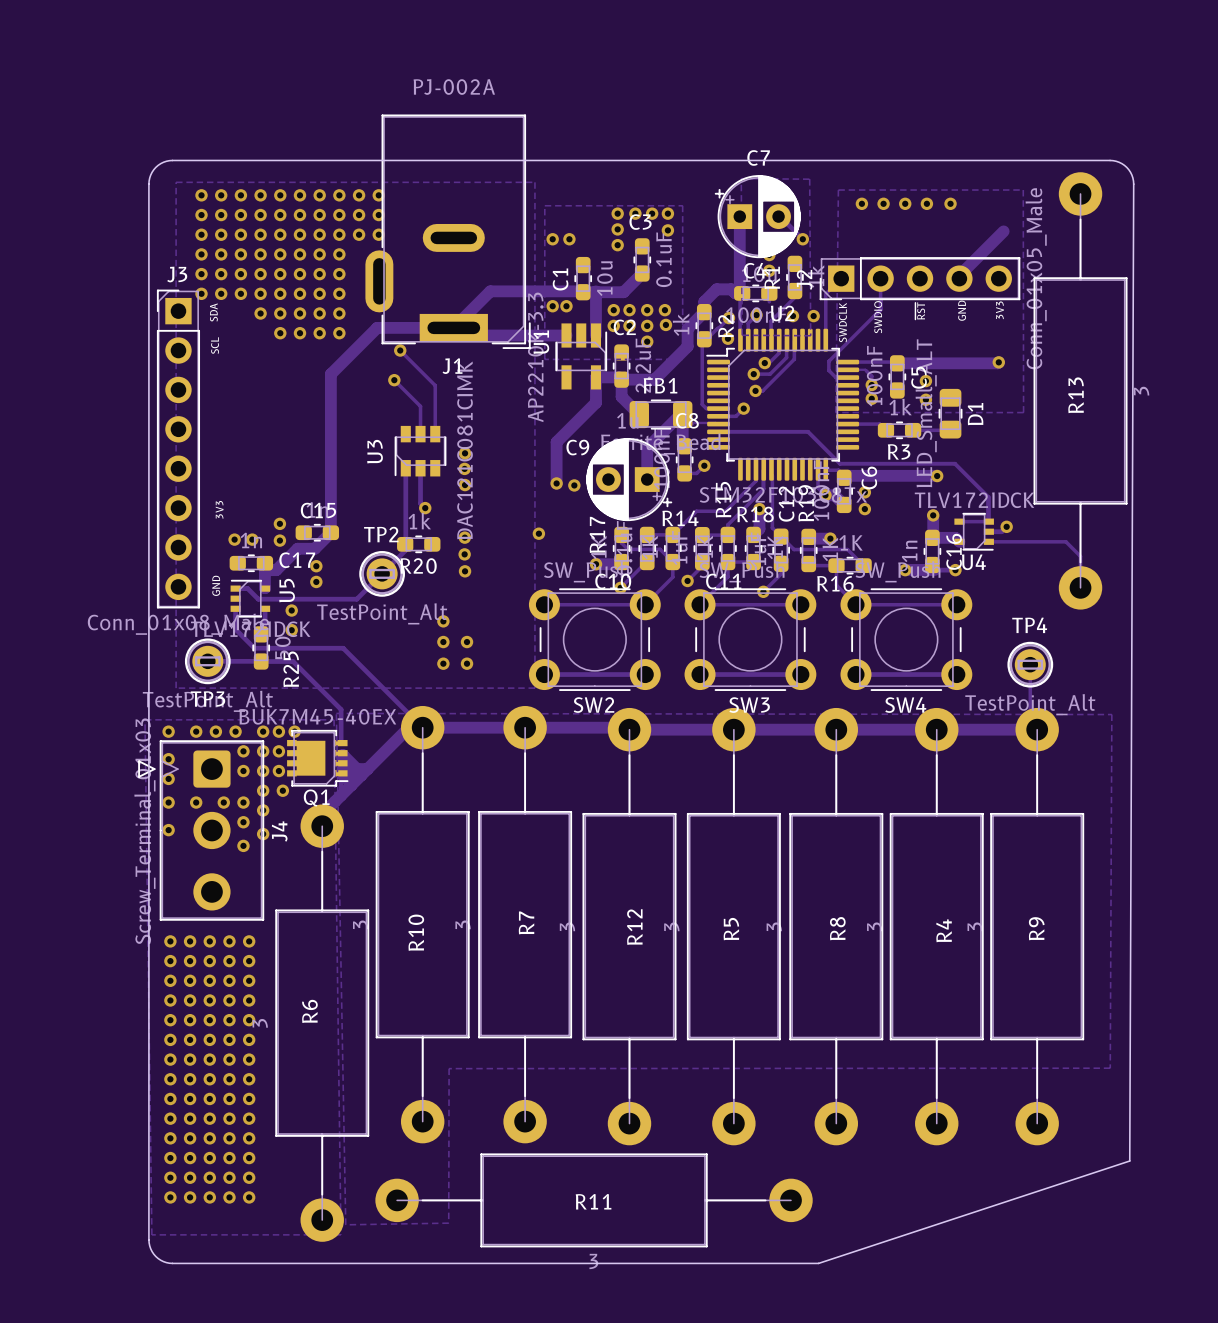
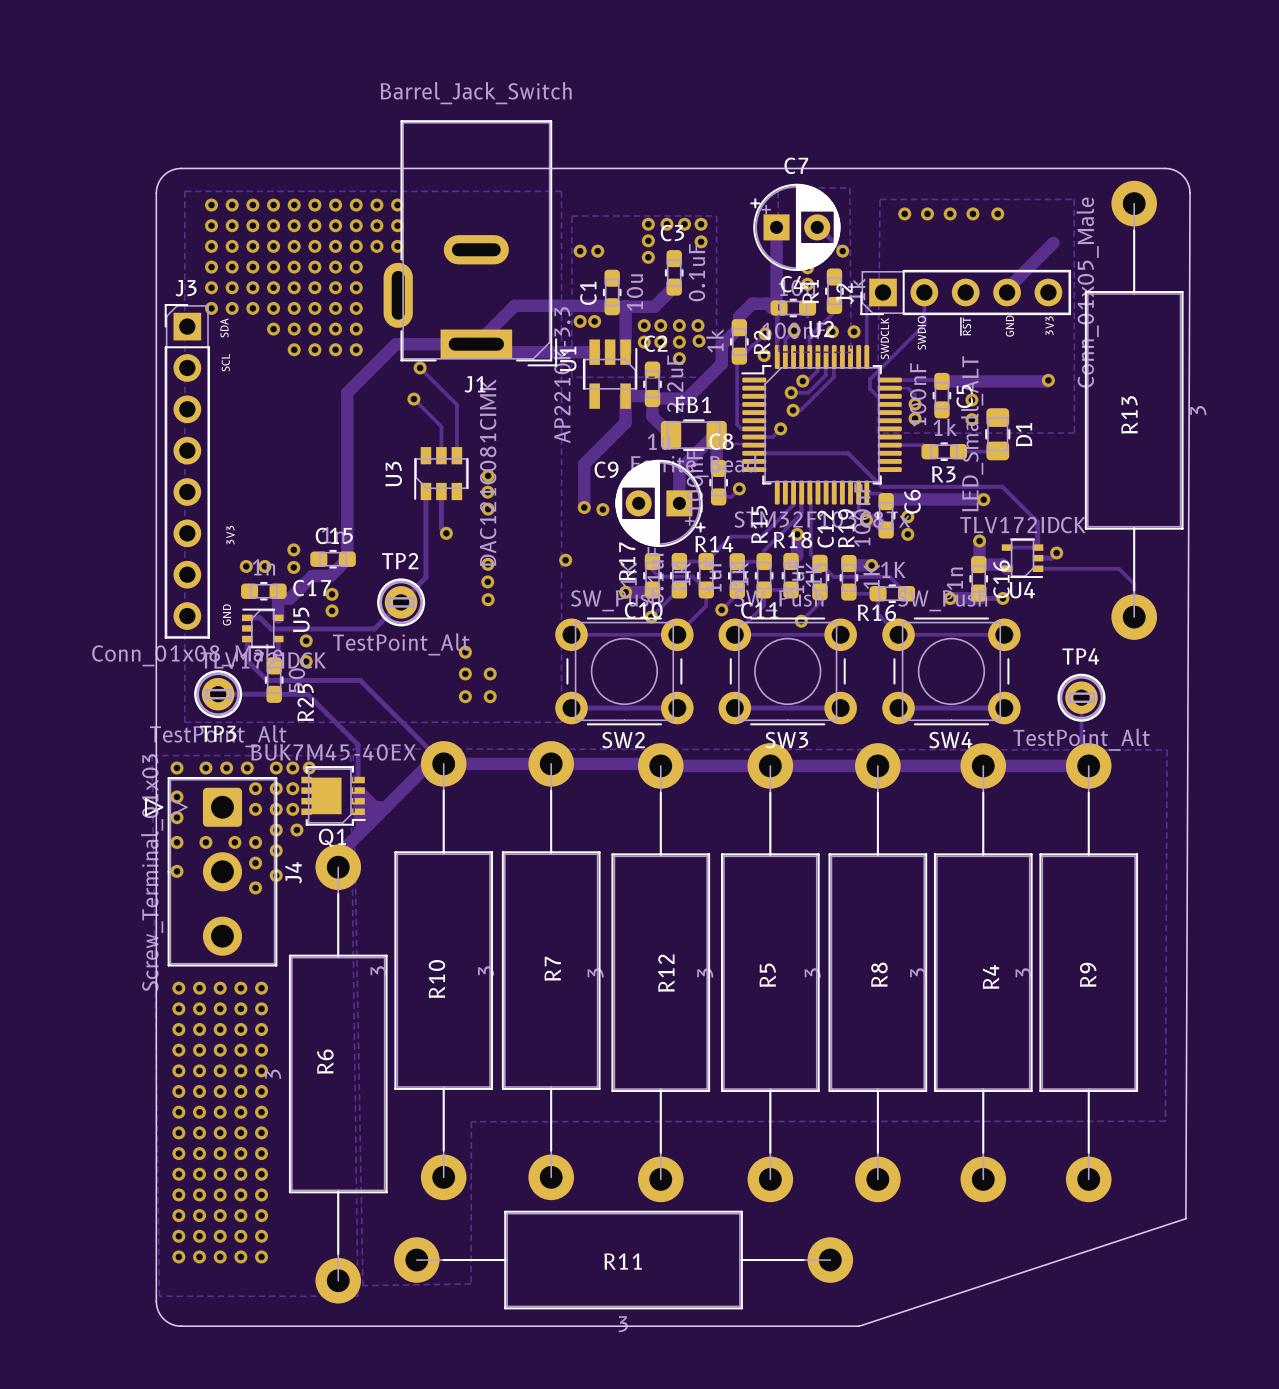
J1 value: PJ-002A (454, 87) -> Barrel_Jack_Switch (476, 93)
R20: 1k (418, 544) -> none

